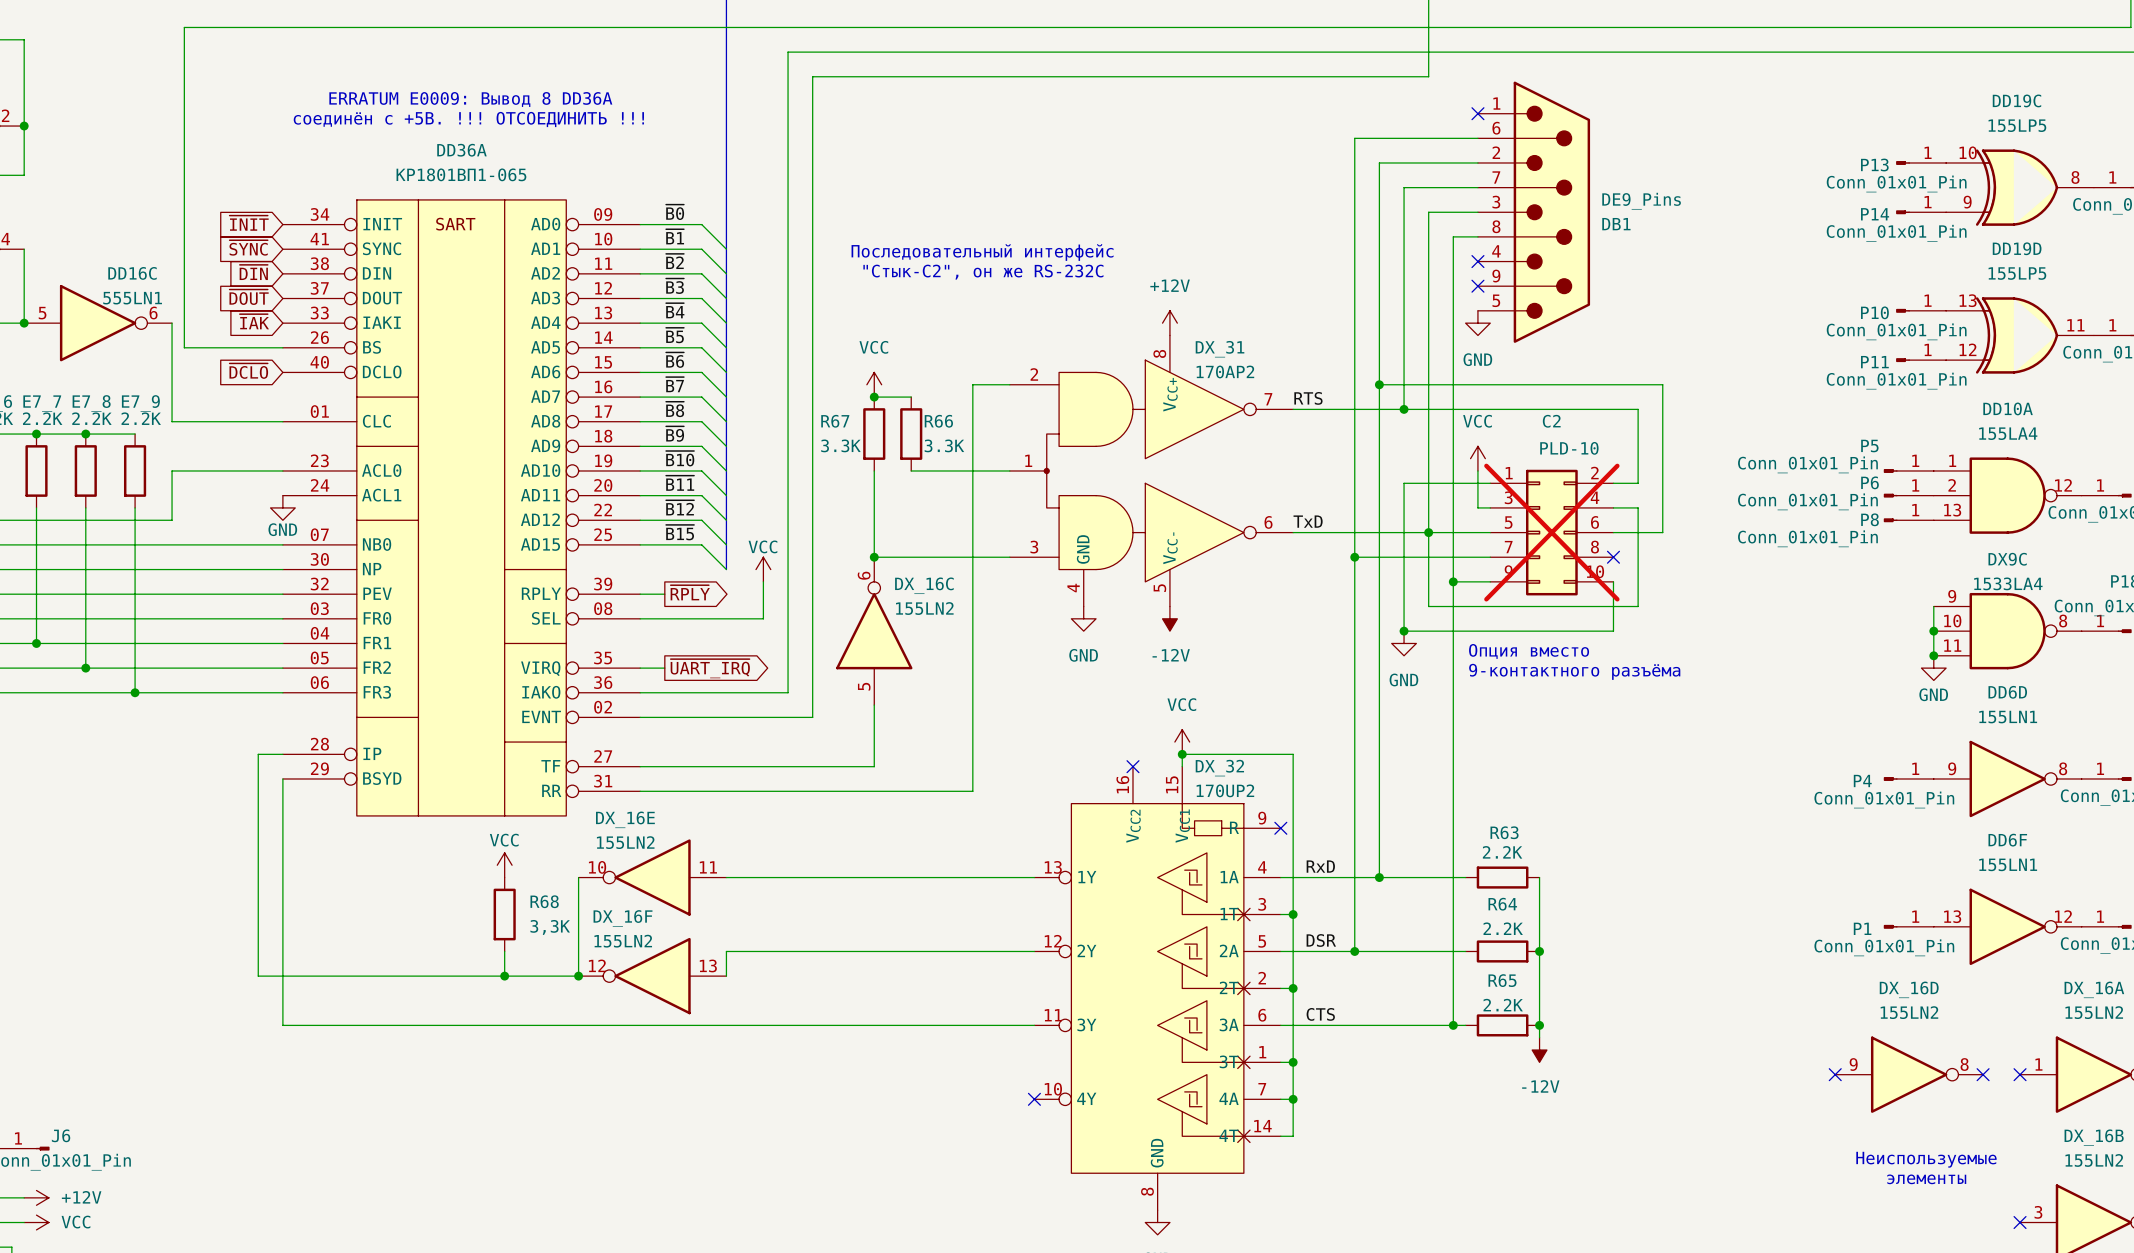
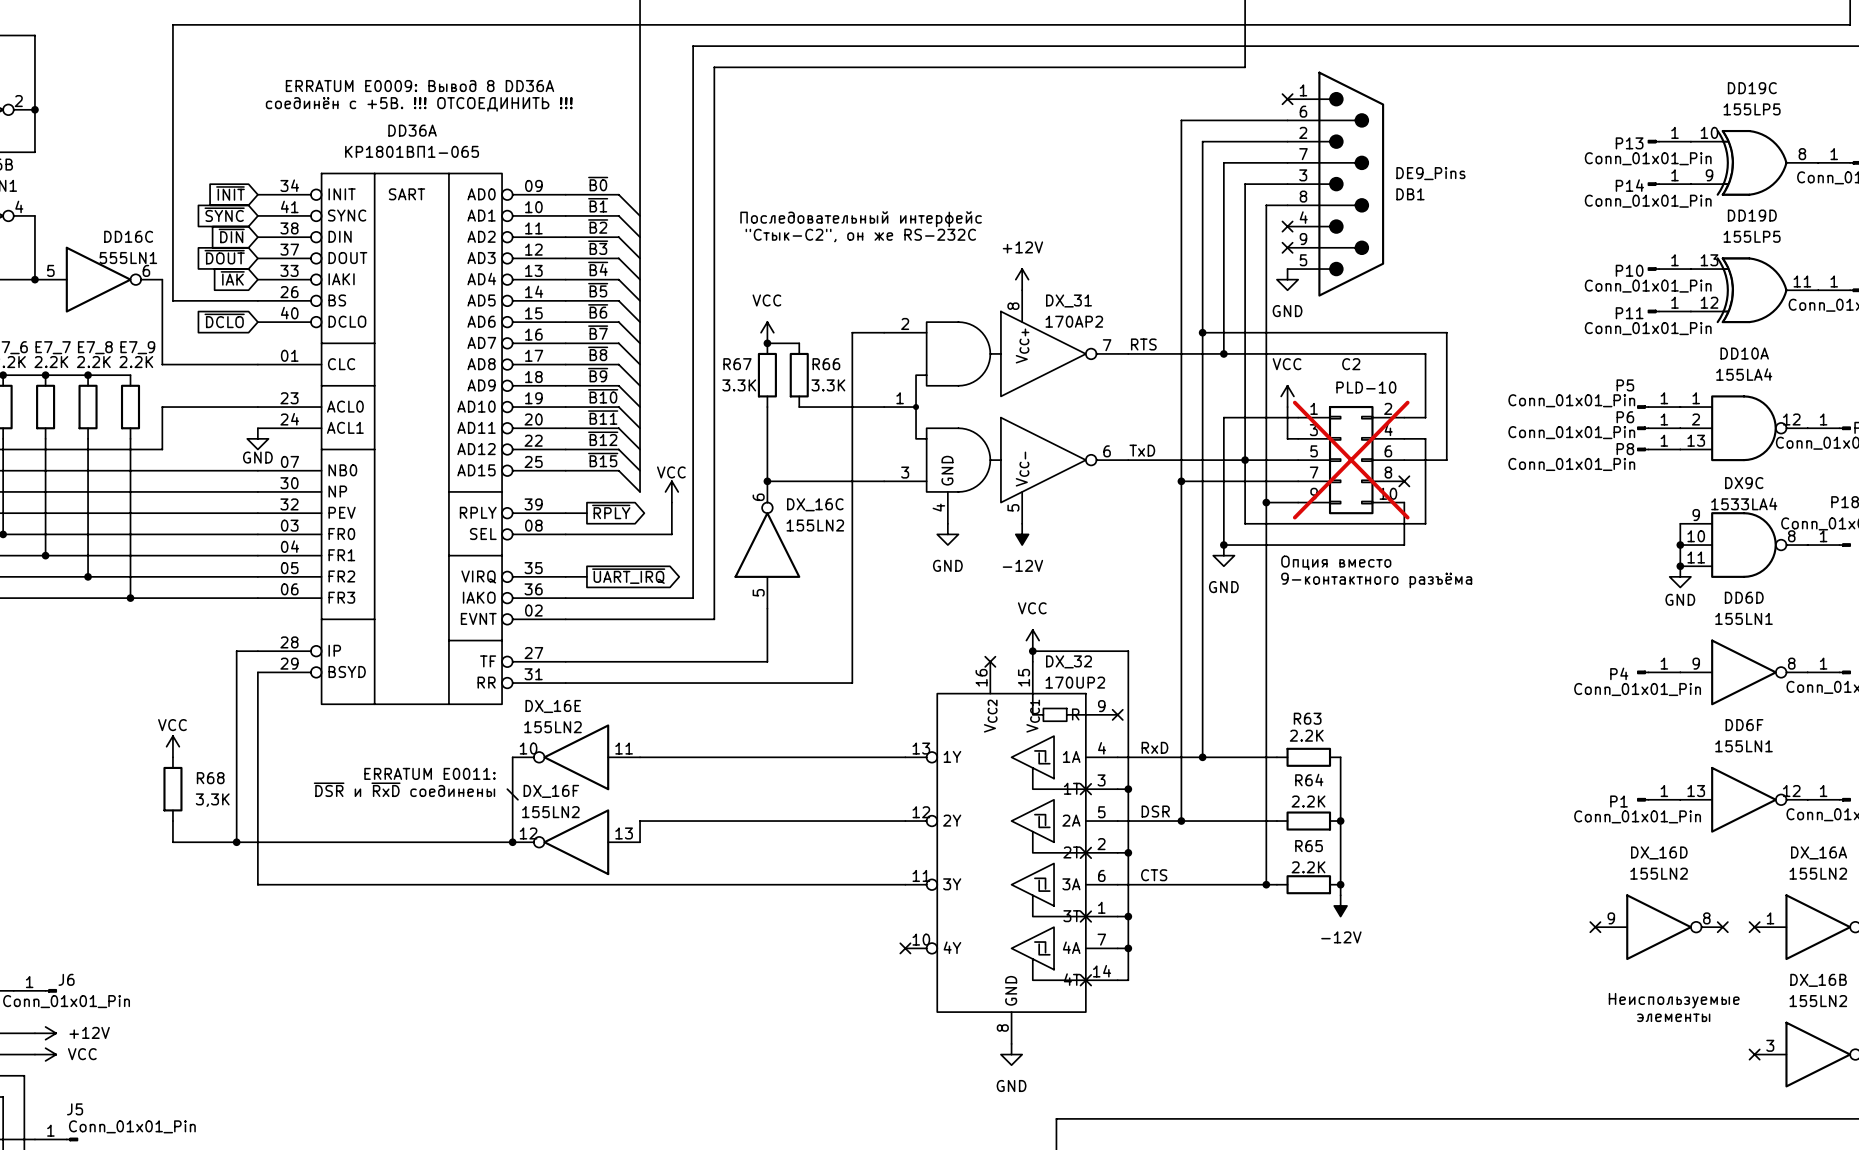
power symbol: none -> VCC (172, 746)
power symbol: VCC (504, 865) -> none
text: none -> ERRATUM E0011: (429, 773)
R68 position: (504, 914) -> (172, 789)
line: none -> (507, 789) (517, 799)
text: none -> ~{DSR} и ~{RxD} соединены (404, 789)
wire: none -> (172, 821) (172, 842) (236, 842)
wire: (504, 951) (504, 976) -> none
junction: none -> (236, 842)
junction: (504, 976) -> none

